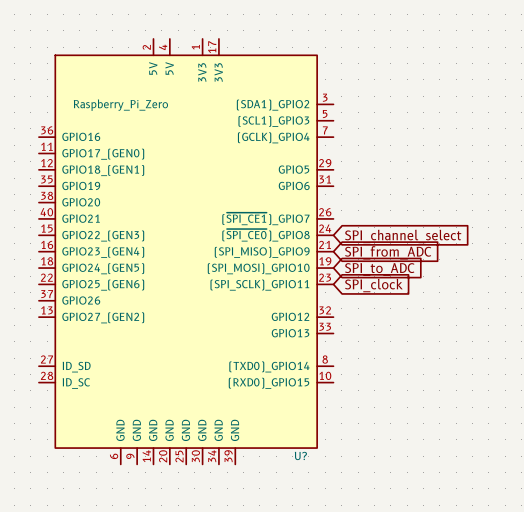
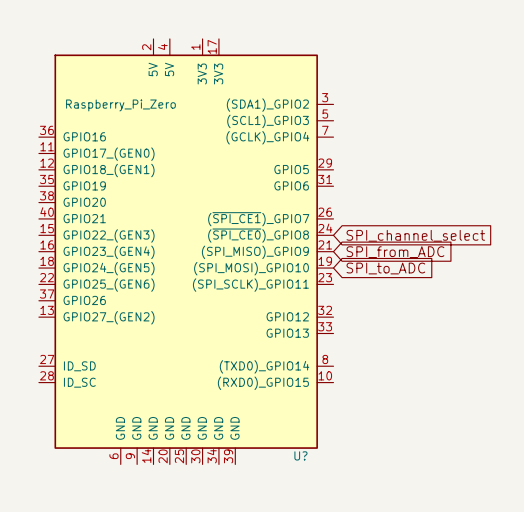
global label: SPI_clock (373, 285) -> none

